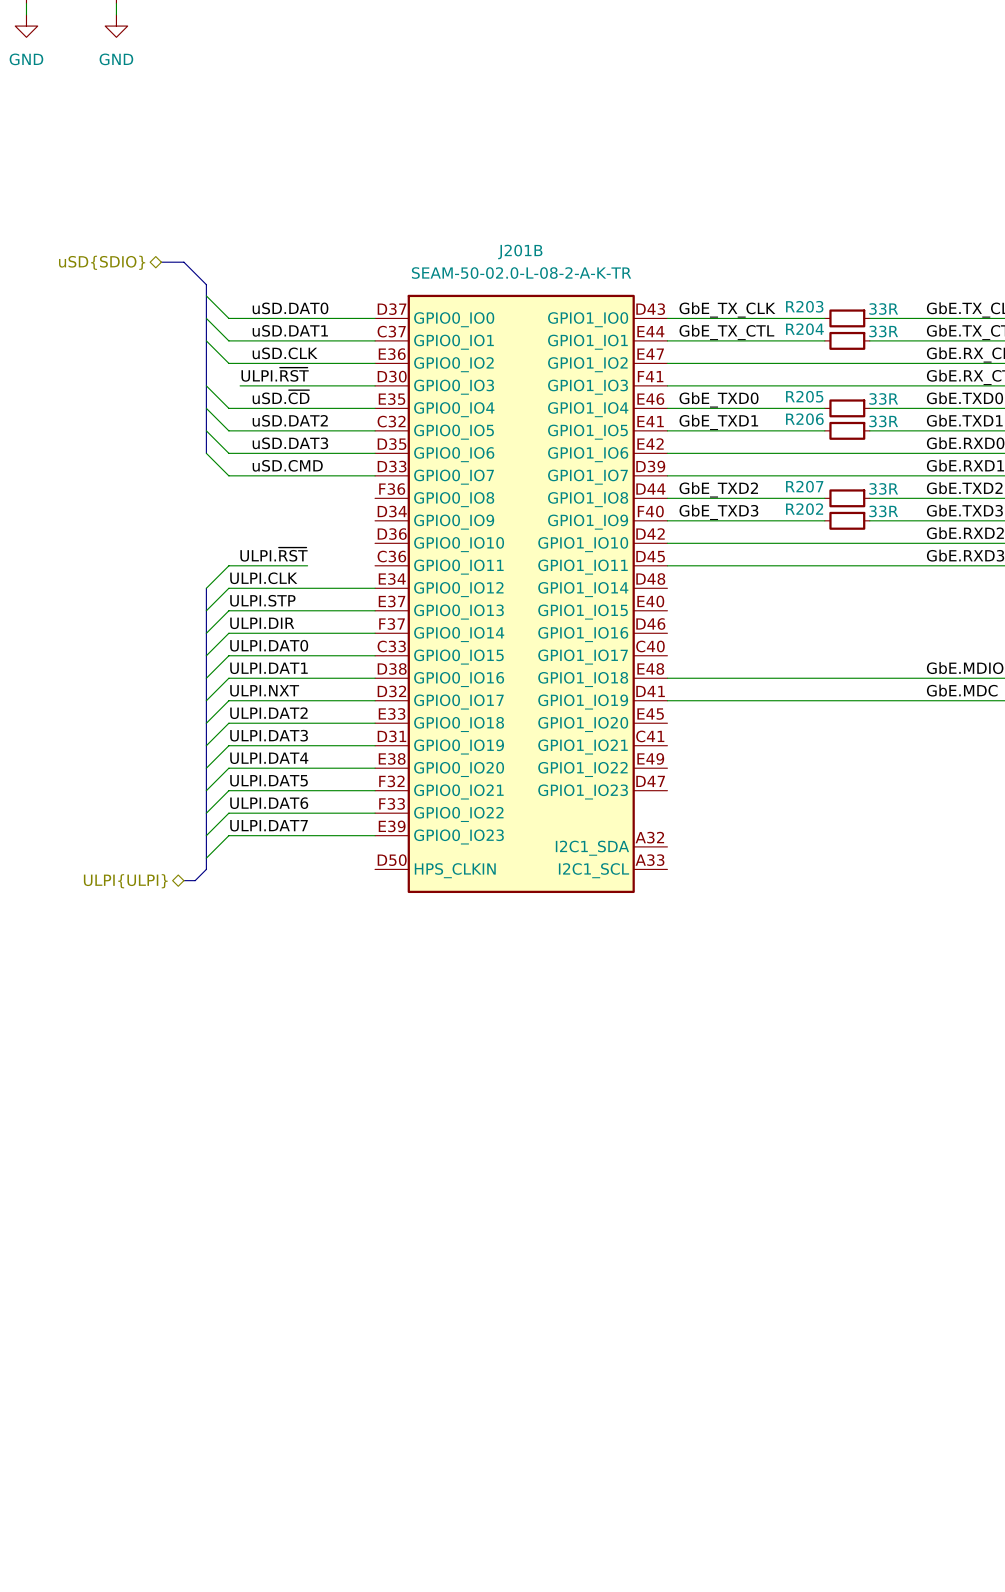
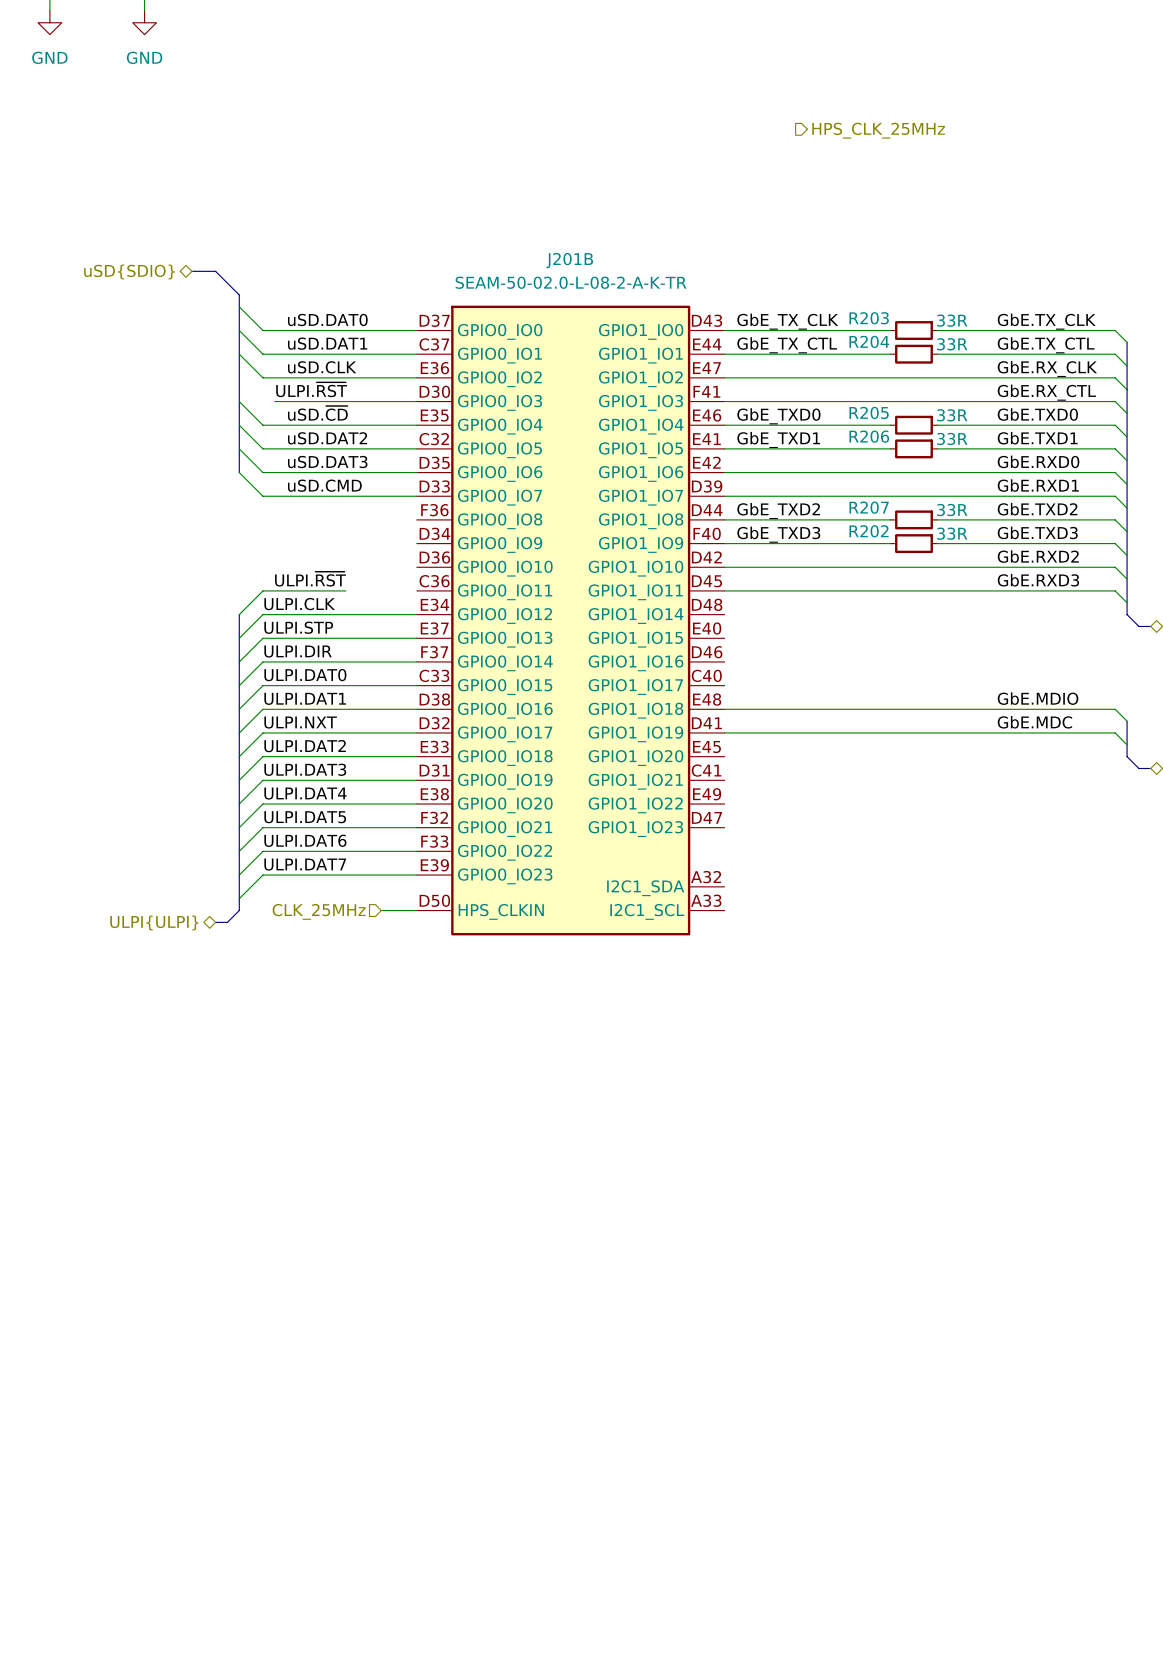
hierarchical label: none -> HPS_CLK_25MHz (878, 130)
wire: none -> (381, 910) (416, 910)
hierarchical label: none -> CLK_25MHz (319, 911)

